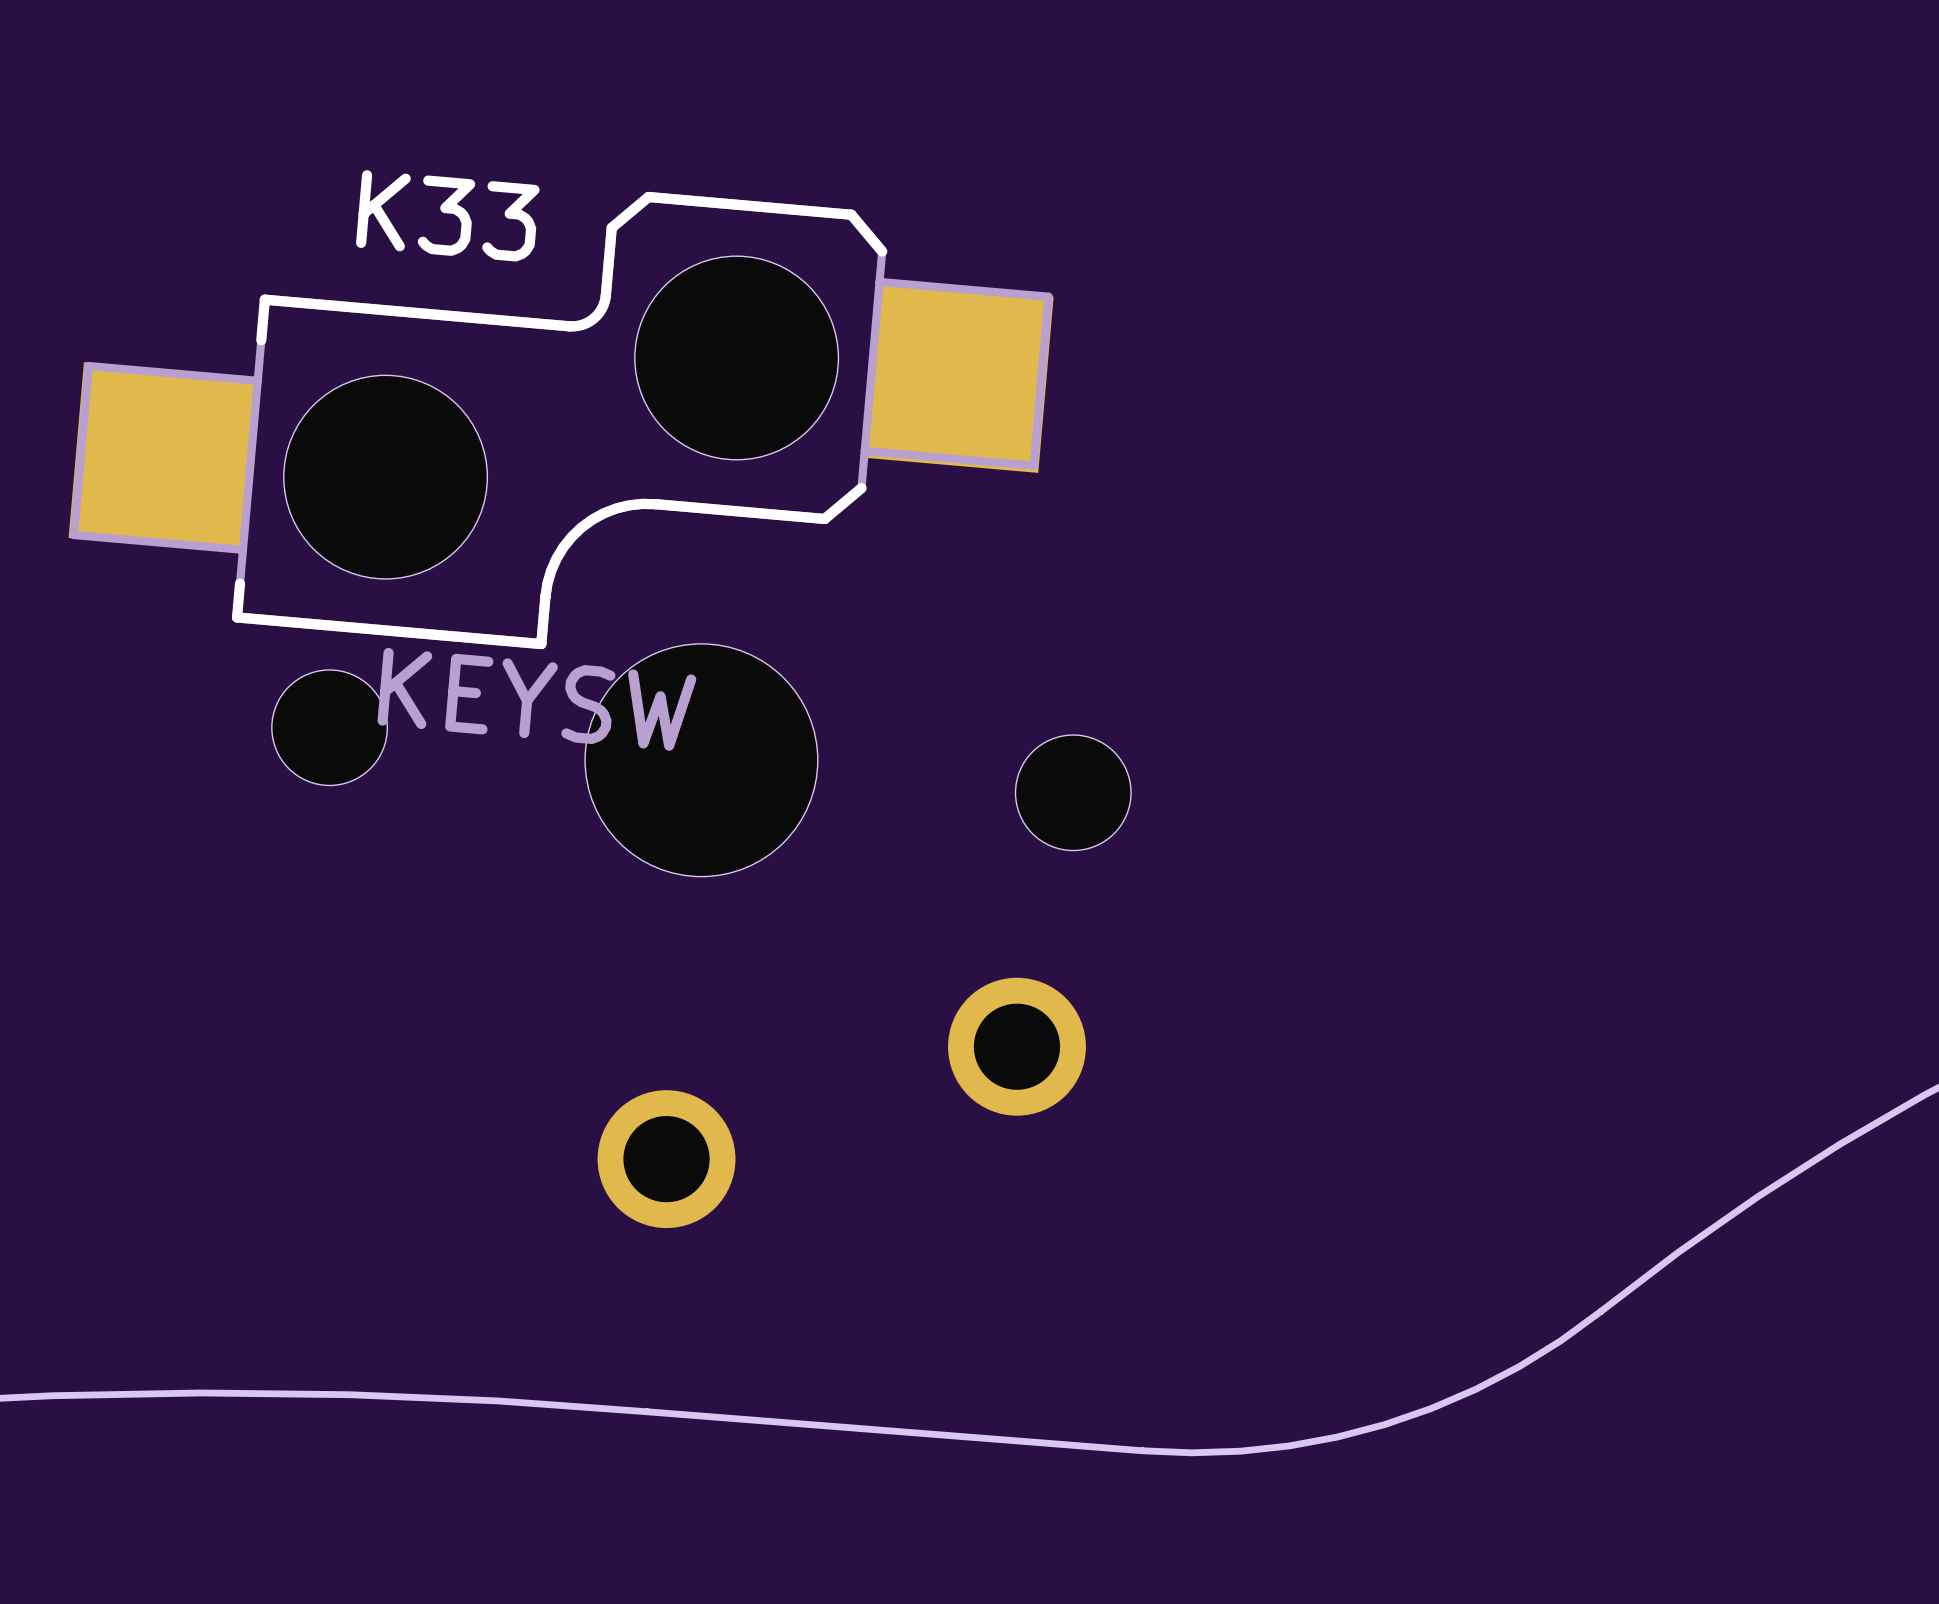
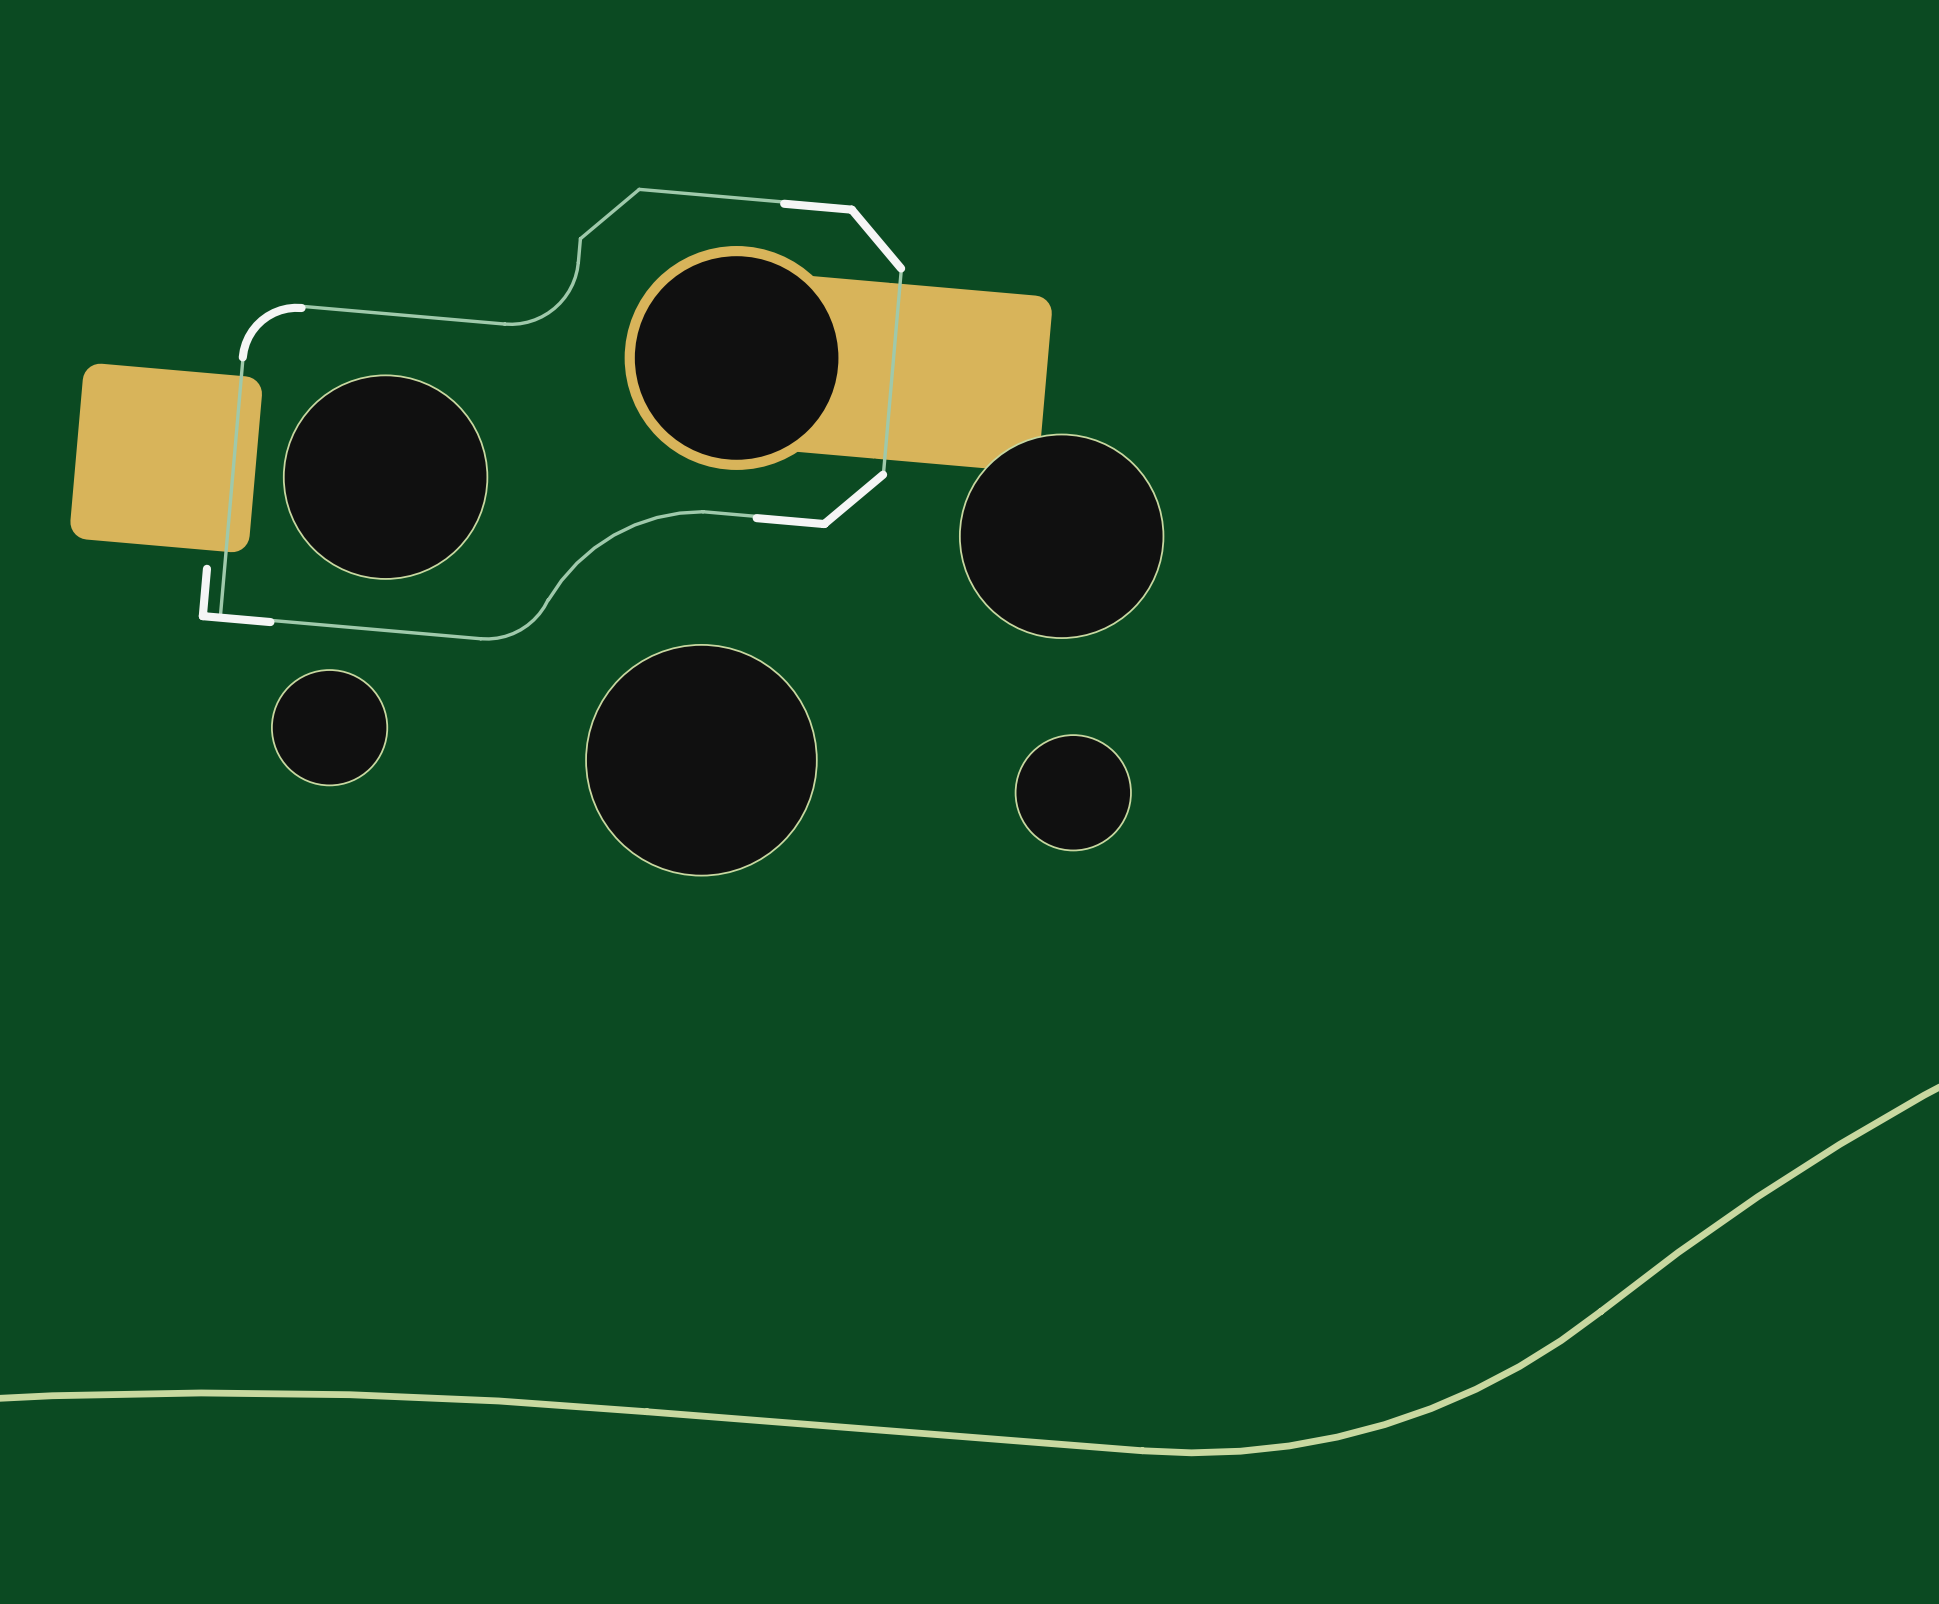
part: none -> (616, 531)
K33: KEYSW (599, 709) -> none

